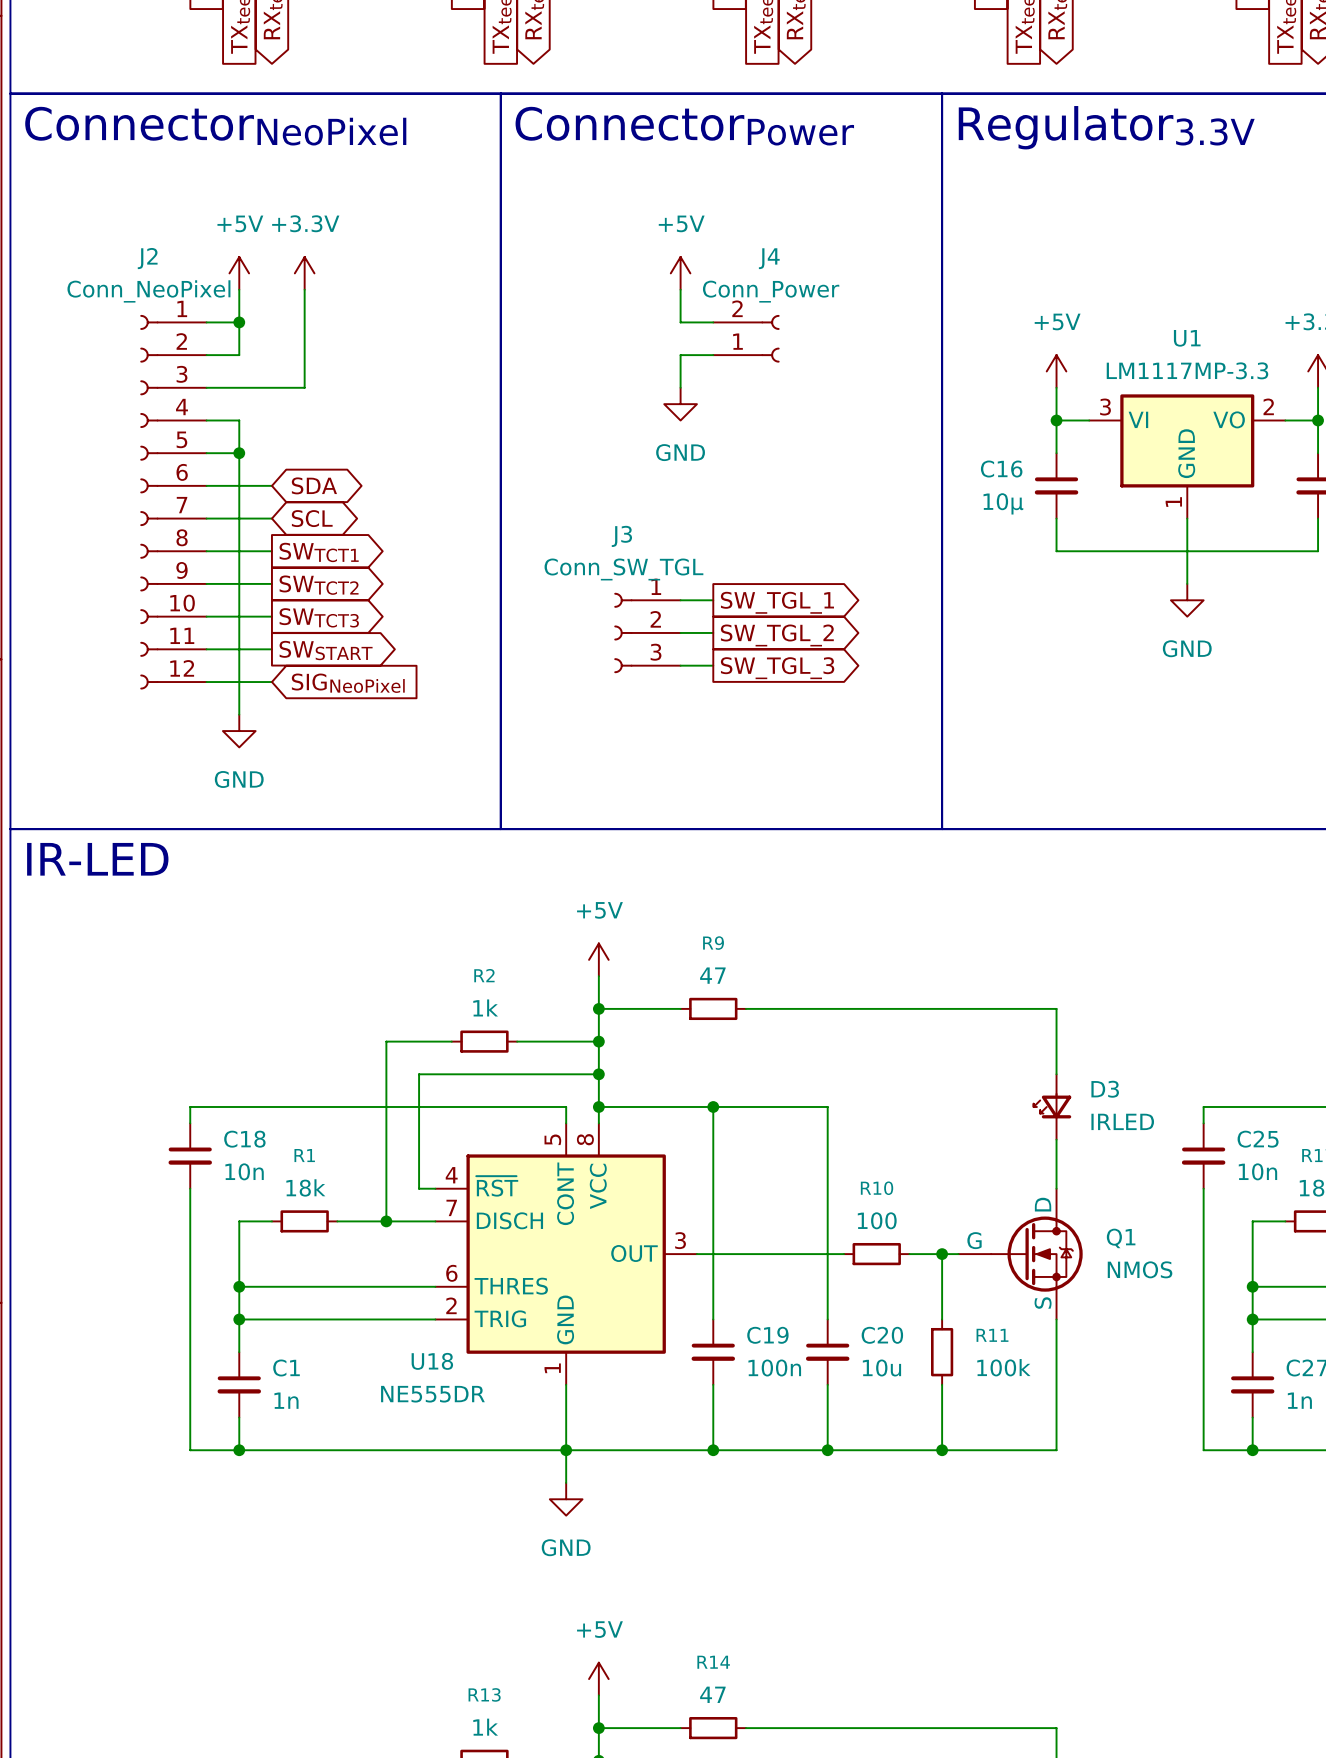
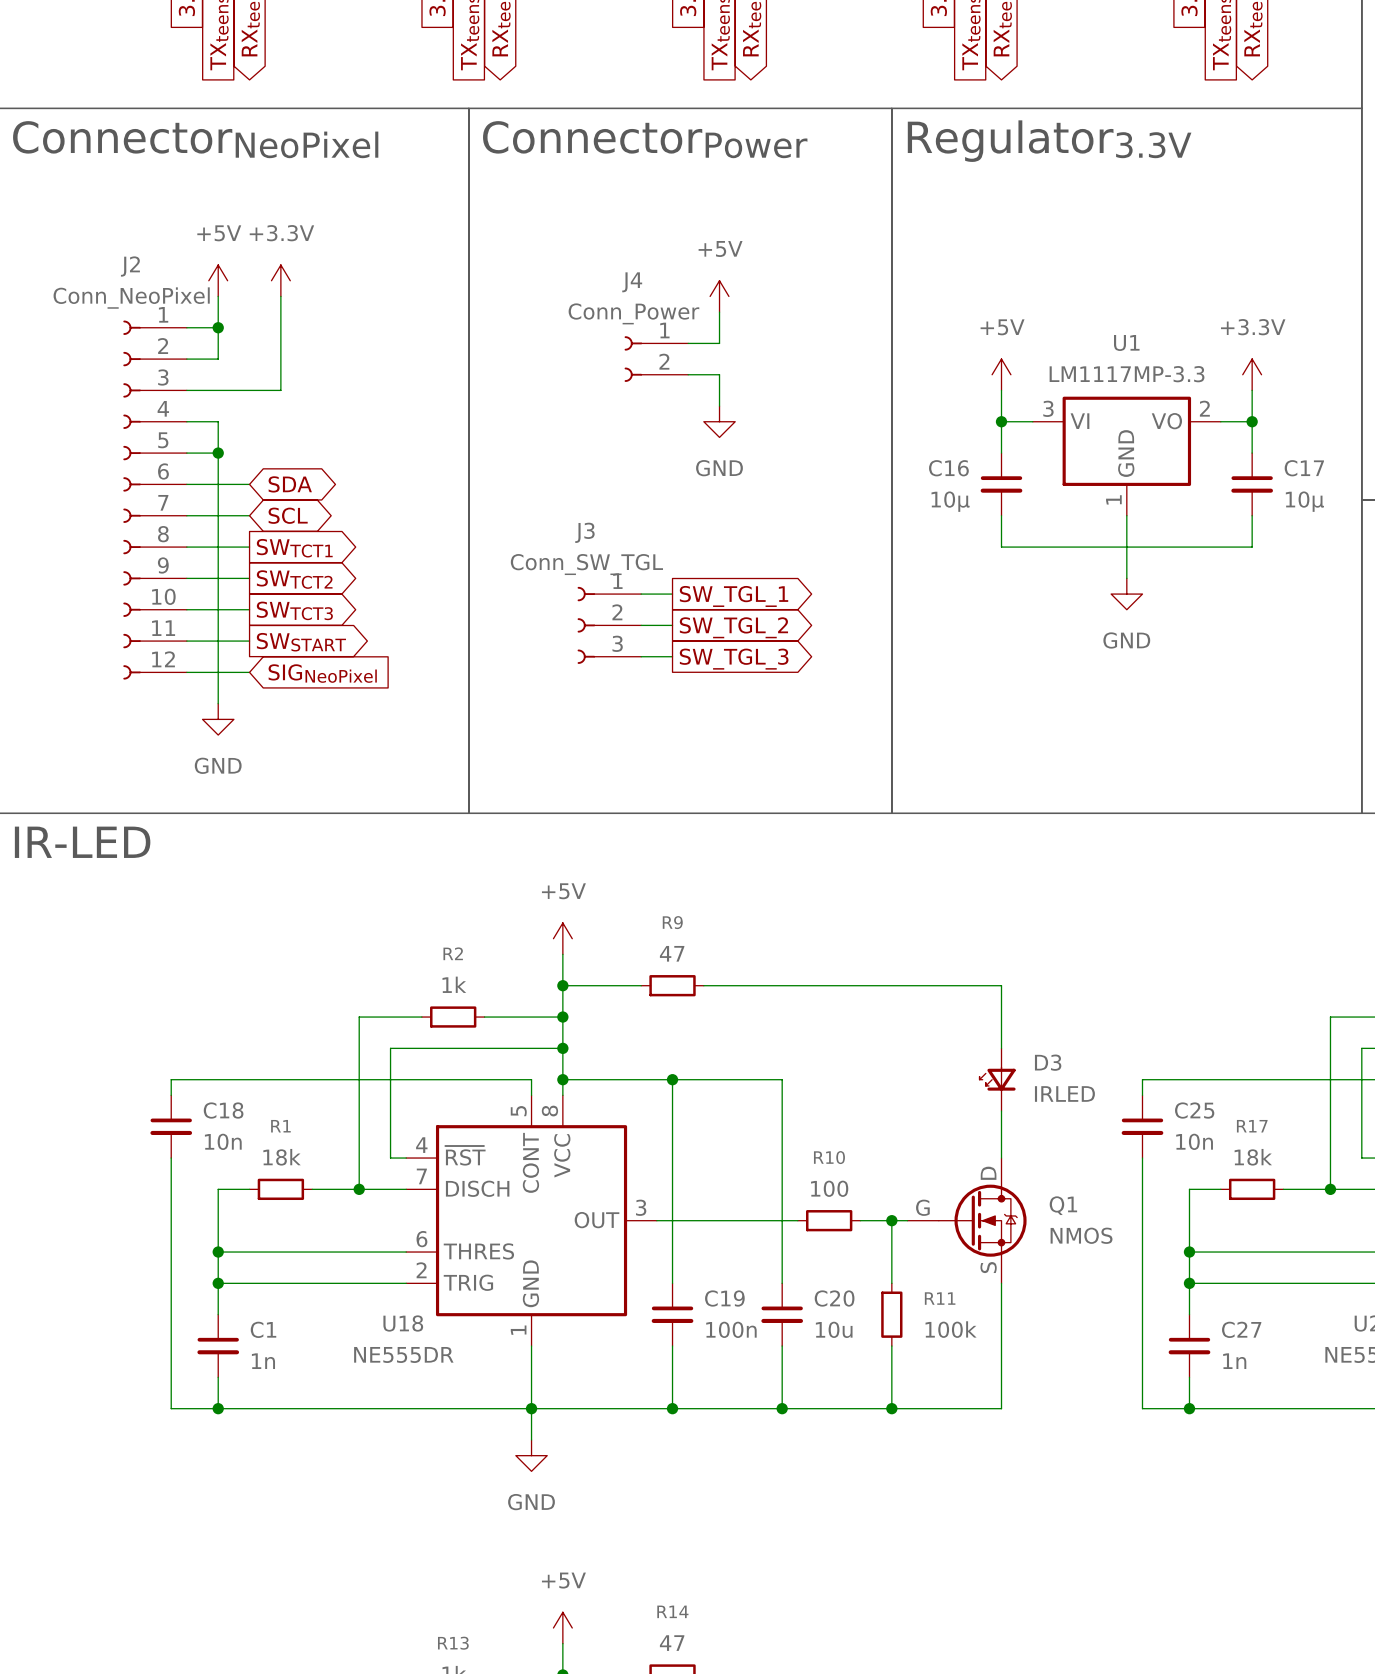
J4 name position: J4 (769, 258) -> J4 (632, 282)
power symbol position: +5V (680, 273) -> +5V (719, 296)
wire: (680, 289) (680, 322) (713, 322) -> none
J4 value position: Conn_Power (771, 291) -> Conn_Power (633, 313)
wire: none -> (719, 312) (719, 343) (688, 343)
J4 position: (746, 338) -> (656, 359)
J4 rotation: 0° (770, 338) -> 180° (633, 359)
wire: (713, 355) (680, 355) (680, 387) -> none
wire: none -> (688, 374) (719, 374) (719, 406)
power symbol position: GND (680, 404) -> GND (719, 421)

